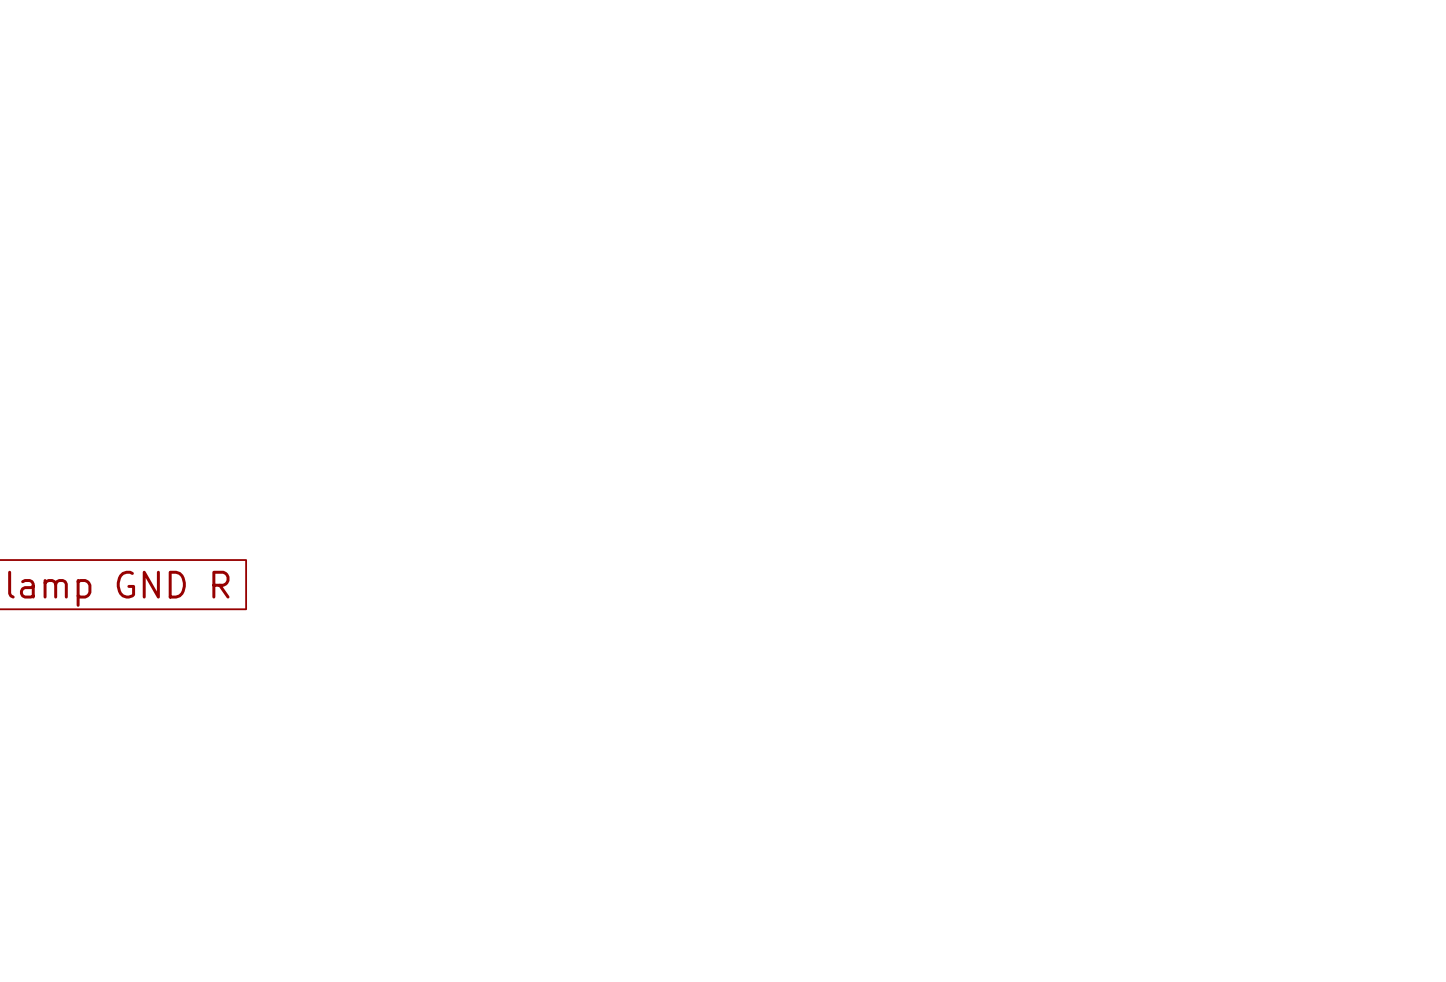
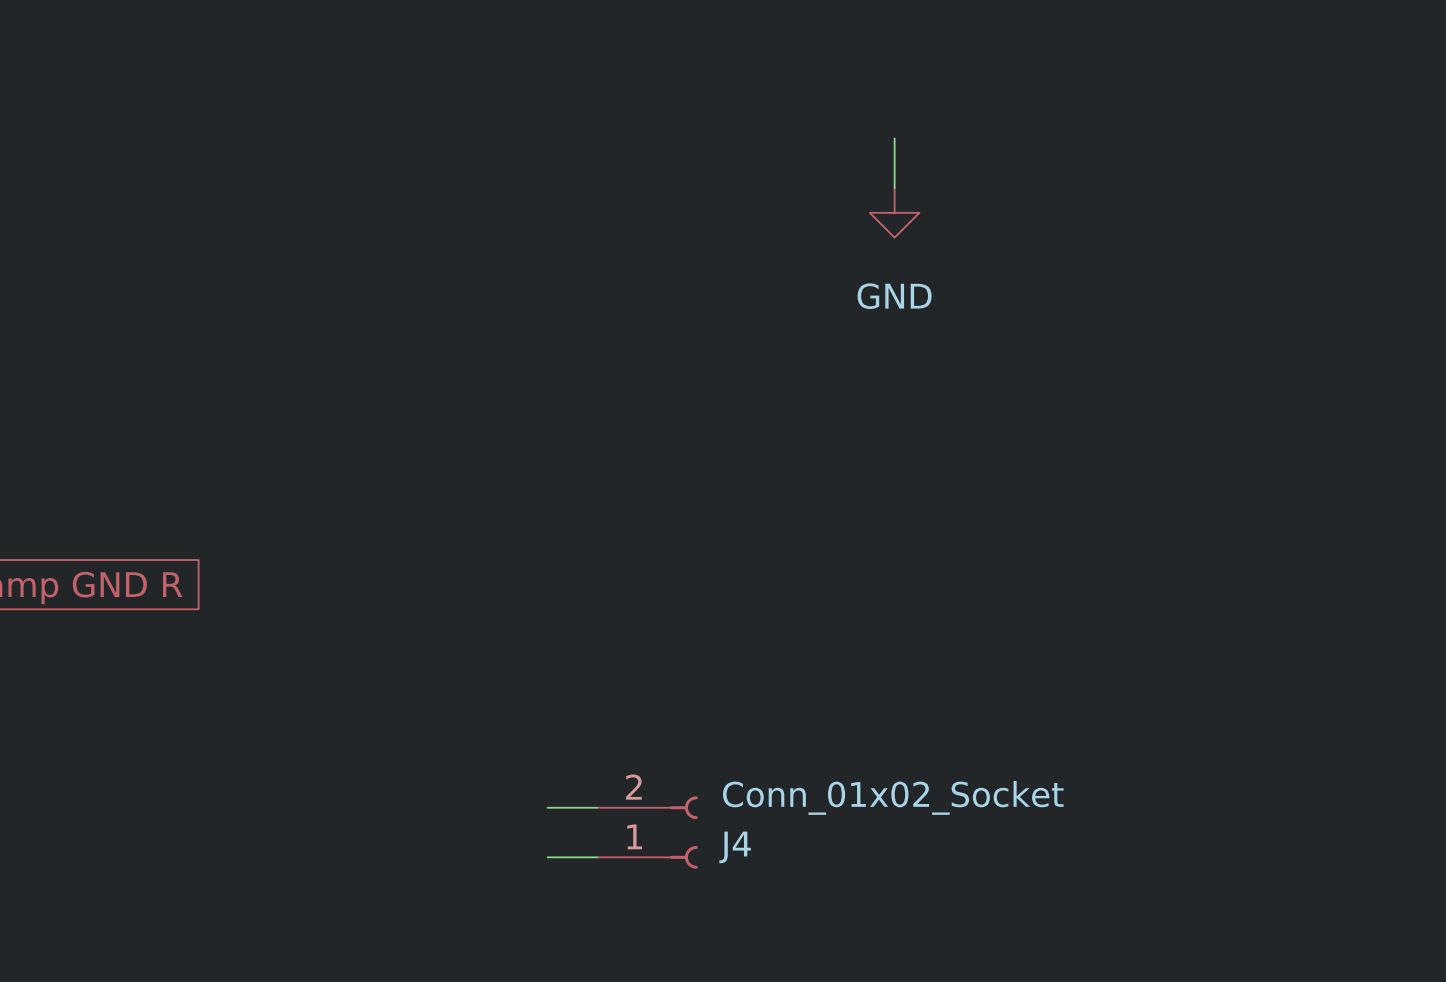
wire: none -> (894, 138) (894, 188)
power symbol: none -> GND (894, 212)
wire: none -> (547, 807) (597, 807)
J4: none -> Conn_01x02_Socket (647, 832)
wire: none -> (547, 857) (597, 857)

